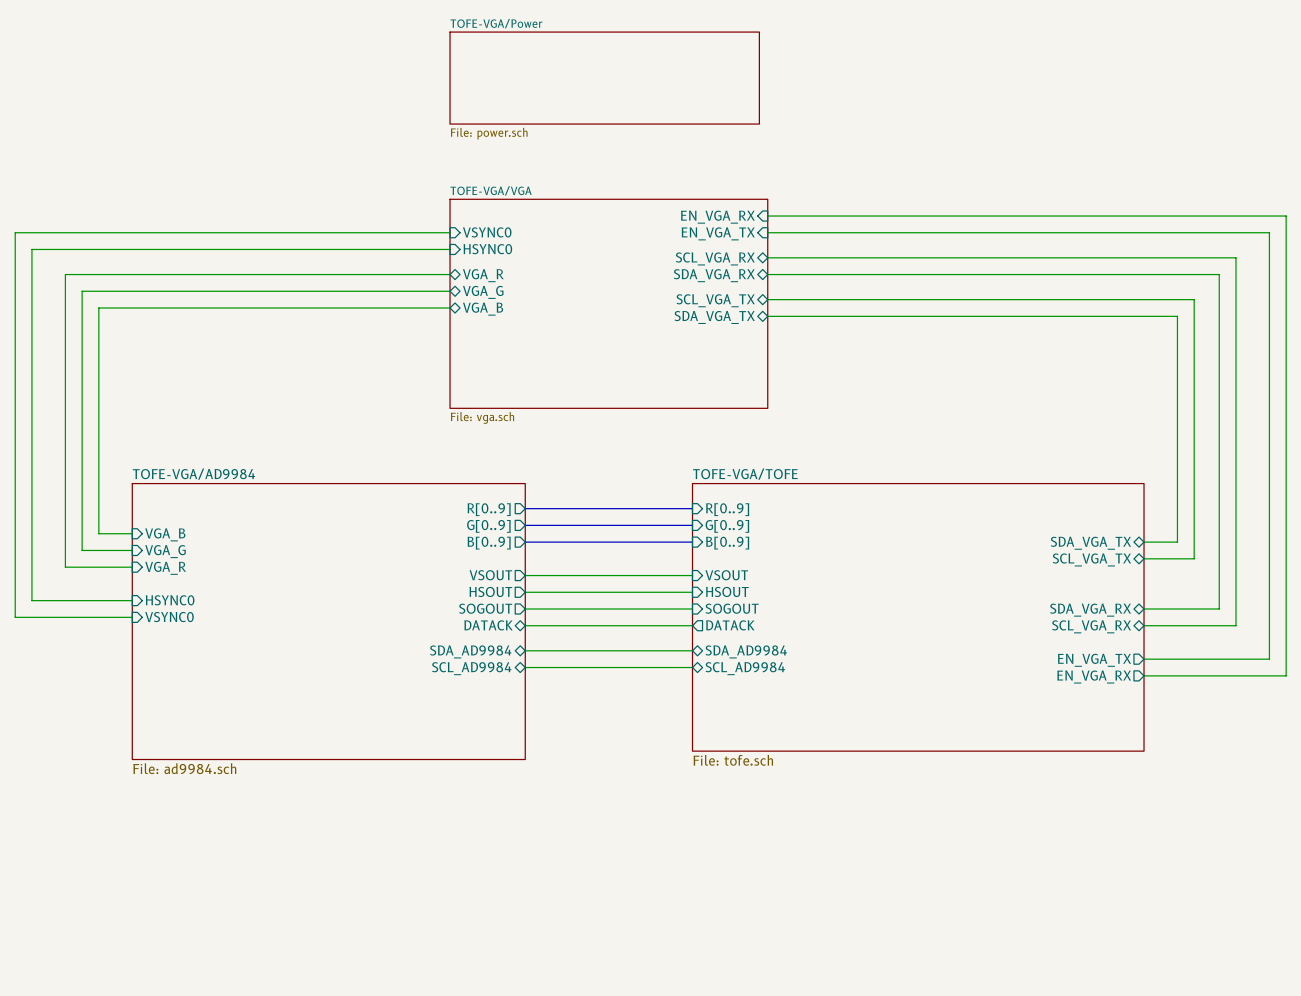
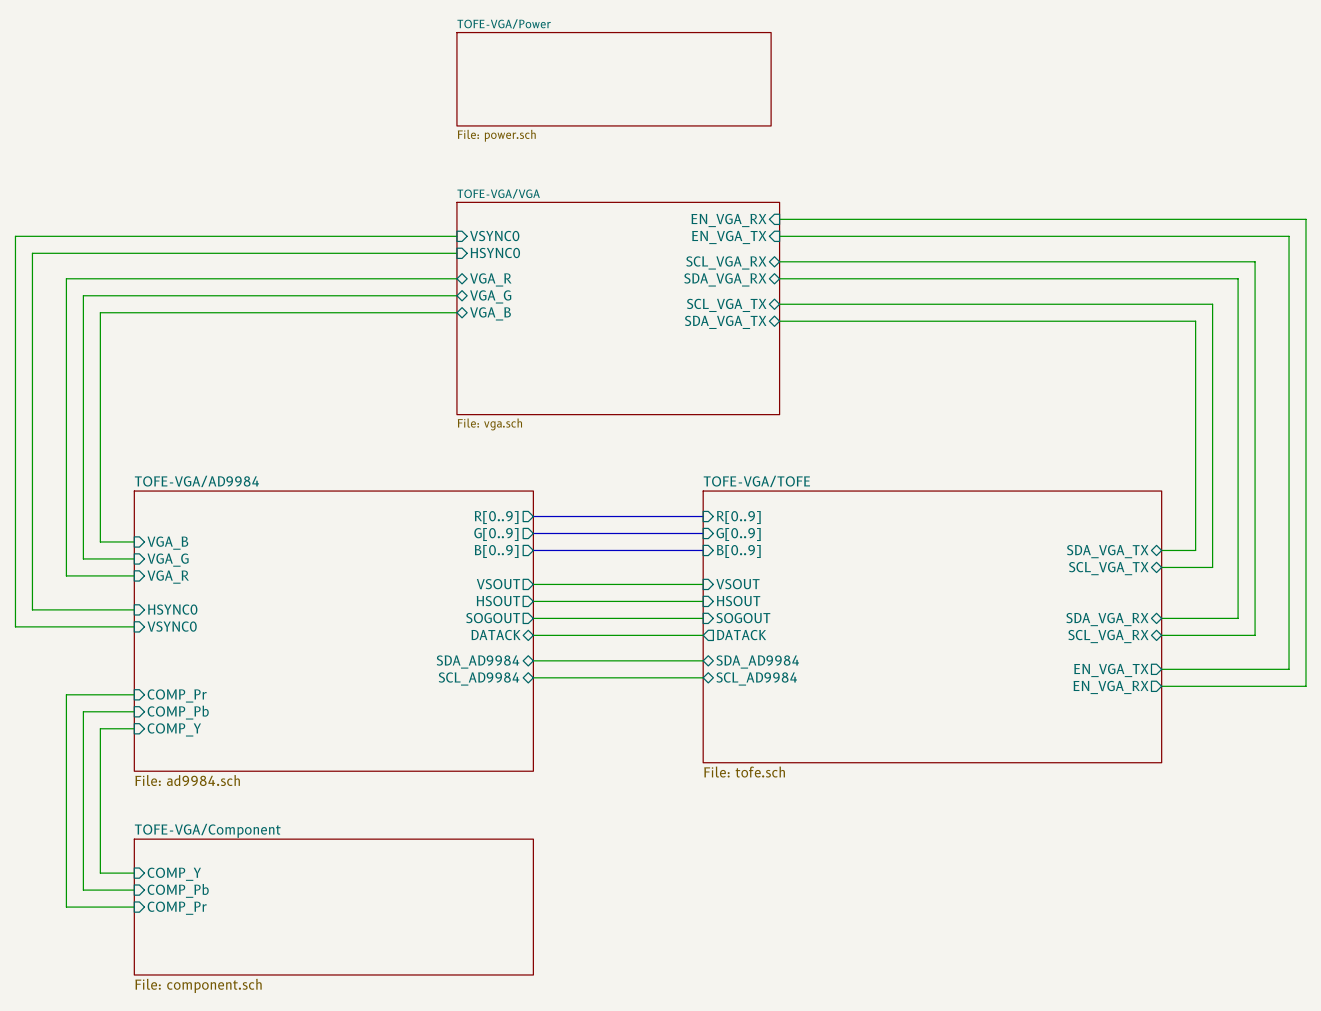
wire: none -> (134, 694) (66, 694) (66, 907) (134, 907)
sheet pin: none -> COMP_Pr (177, 695)
wire: none -> (134, 711) (83, 711) (83, 890) (134, 890)
sheet pin: none -> COMP_Pb (178, 712)
wire: none -> (134, 728) (100, 728) (100, 873) (134, 873)
sheet pin: none -> COMP_Y (174, 729)
sheet pin: none -> COMP_Y (174, 874)
sheet pin: none -> COMP_Pb (178, 890)
sheet TOFE-VGA/Component: none -> File: component.sch (333, 907)
sheet pin: none -> COMP_Pr (177, 908)

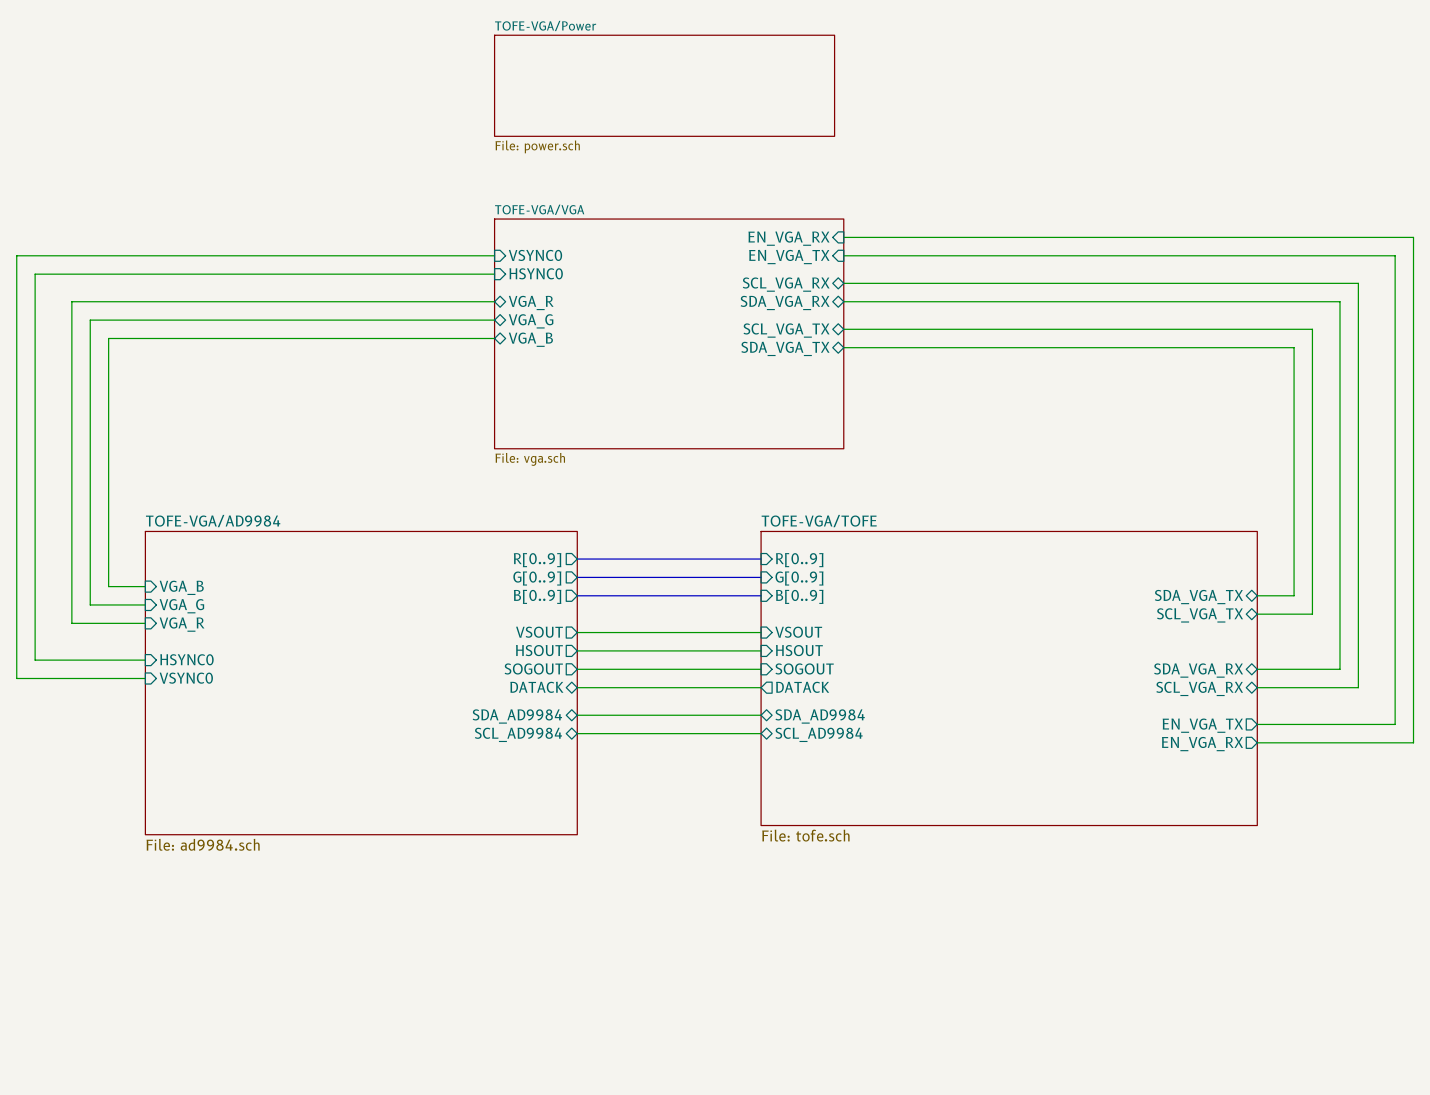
wire: (134, 694) (66, 694) (66, 907) (134, 907) -> none
sheet pin: COMP_Pr (177, 695) -> none
wire: (134, 711) (83, 711) (83, 890) (134, 890) -> none
sheet pin: COMP_Pb (178, 712) -> none
wire: (134, 728) (100, 728) (100, 873) (134, 873) -> none
sheet pin: COMP_Y (174, 729) -> none
sheet pin: COMP_Y (174, 874) -> none
sheet pin: COMP_Pb (178, 890) -> none
sheet TOFE-VGA/Component: File: component.sch (333, 907) -> none
sheet pin: COMP_Pr (177, 908) -> none

